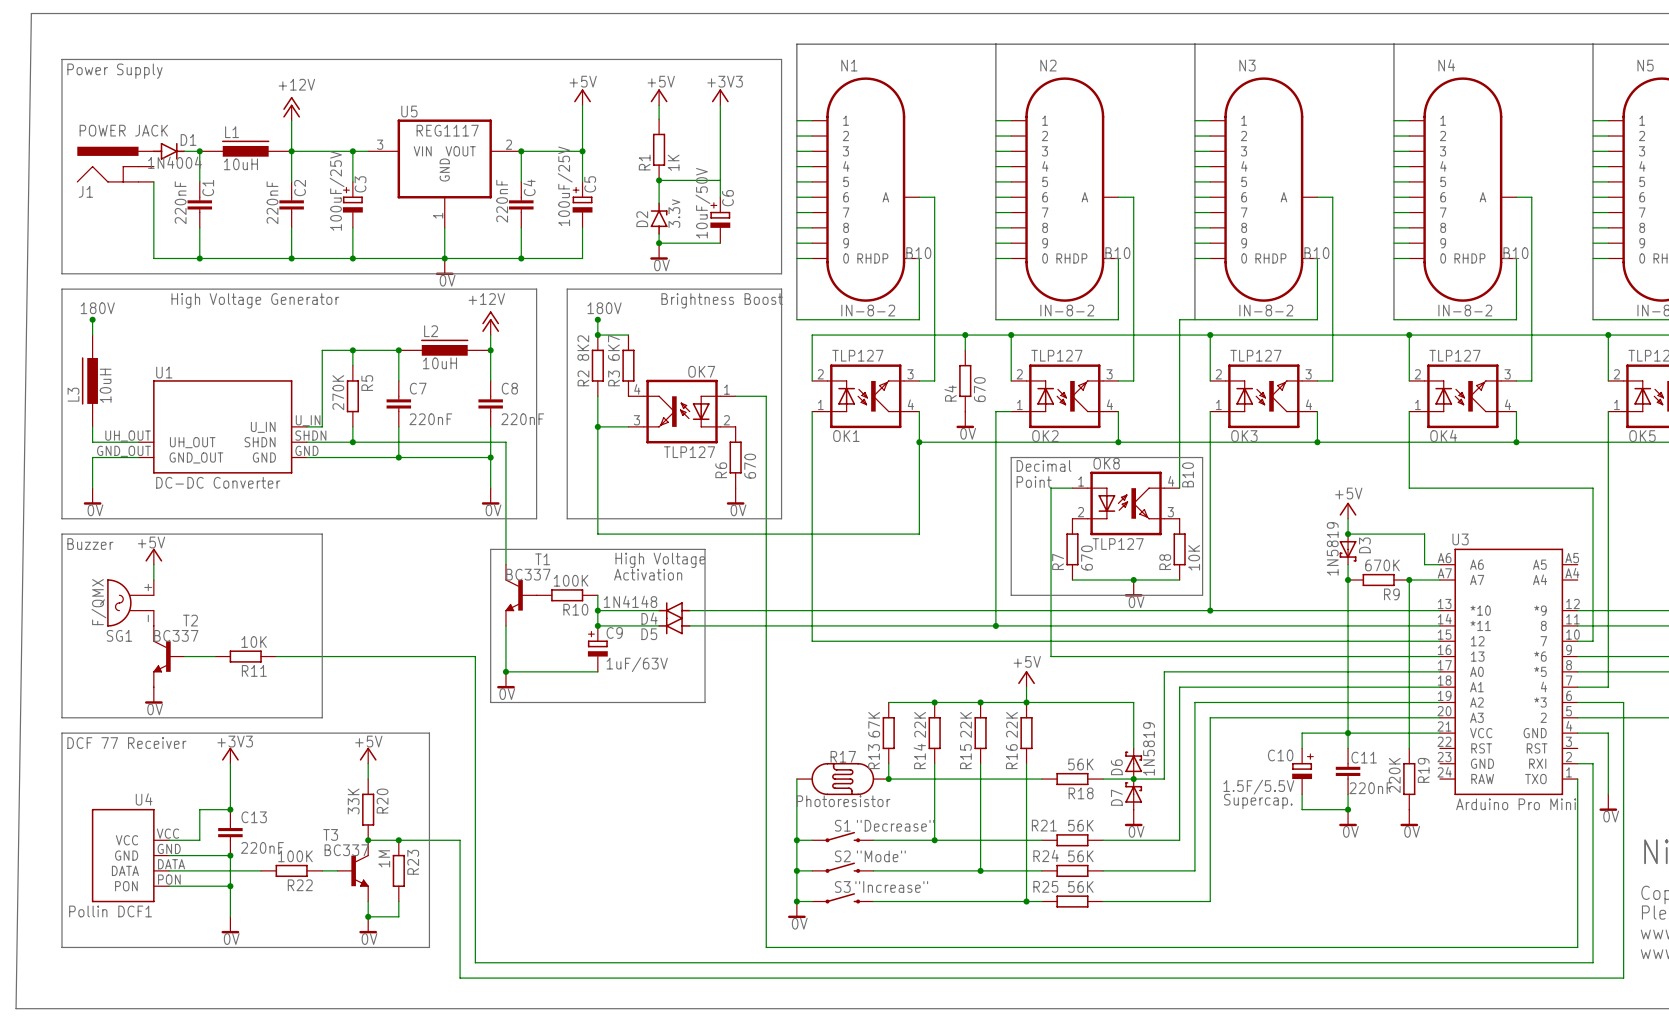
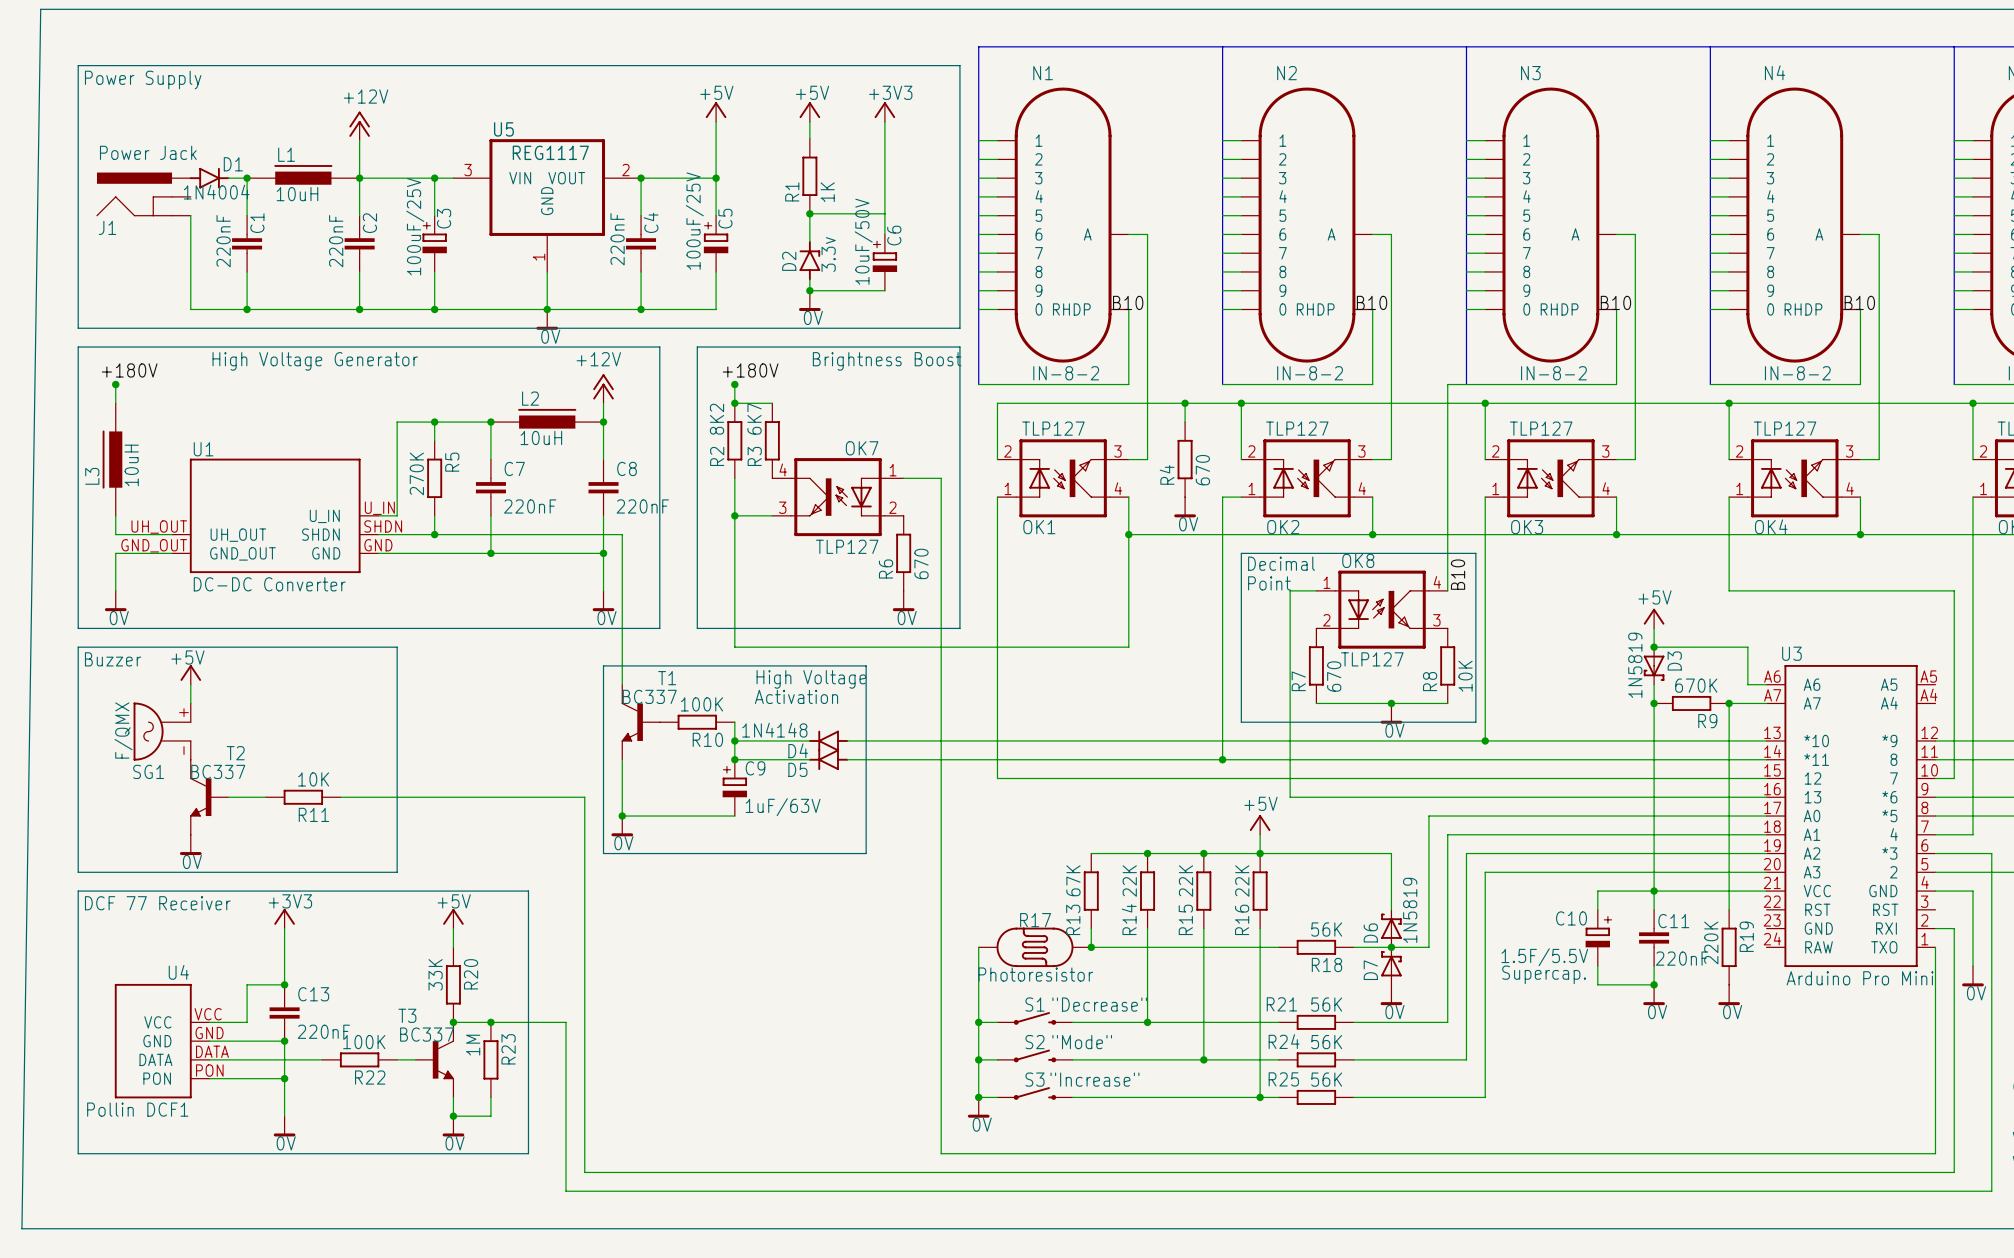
J1 value: POWER JACK (123, 130) -> Power Jack (148, 152)
label: 180V (97, 308) -> +180V (129, 370)
label: 180V (604, 308) -> +180V (750, 370)

